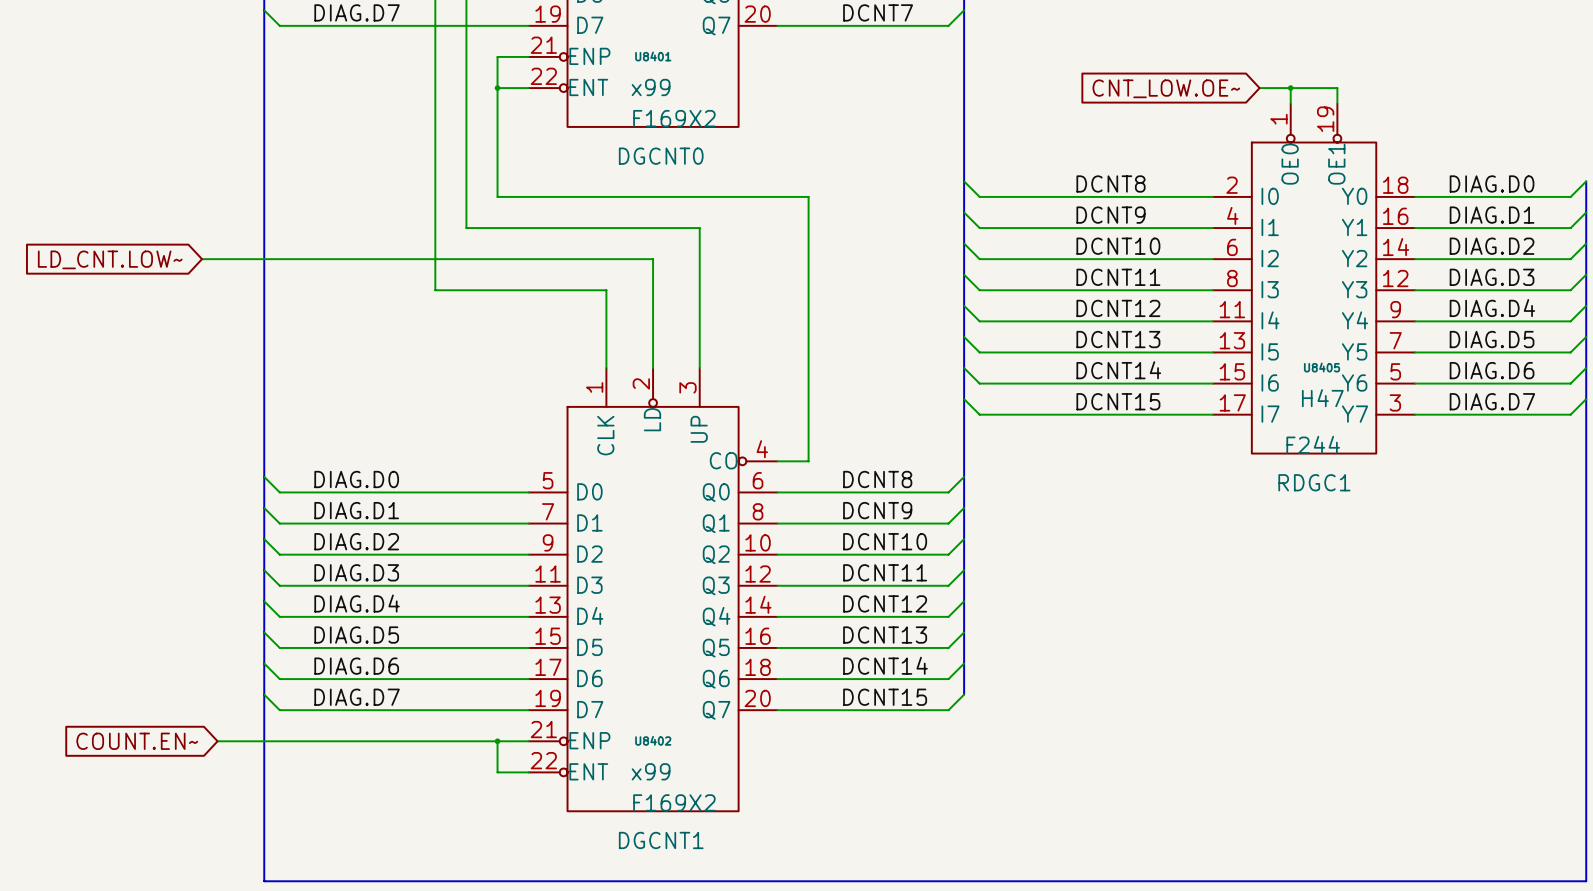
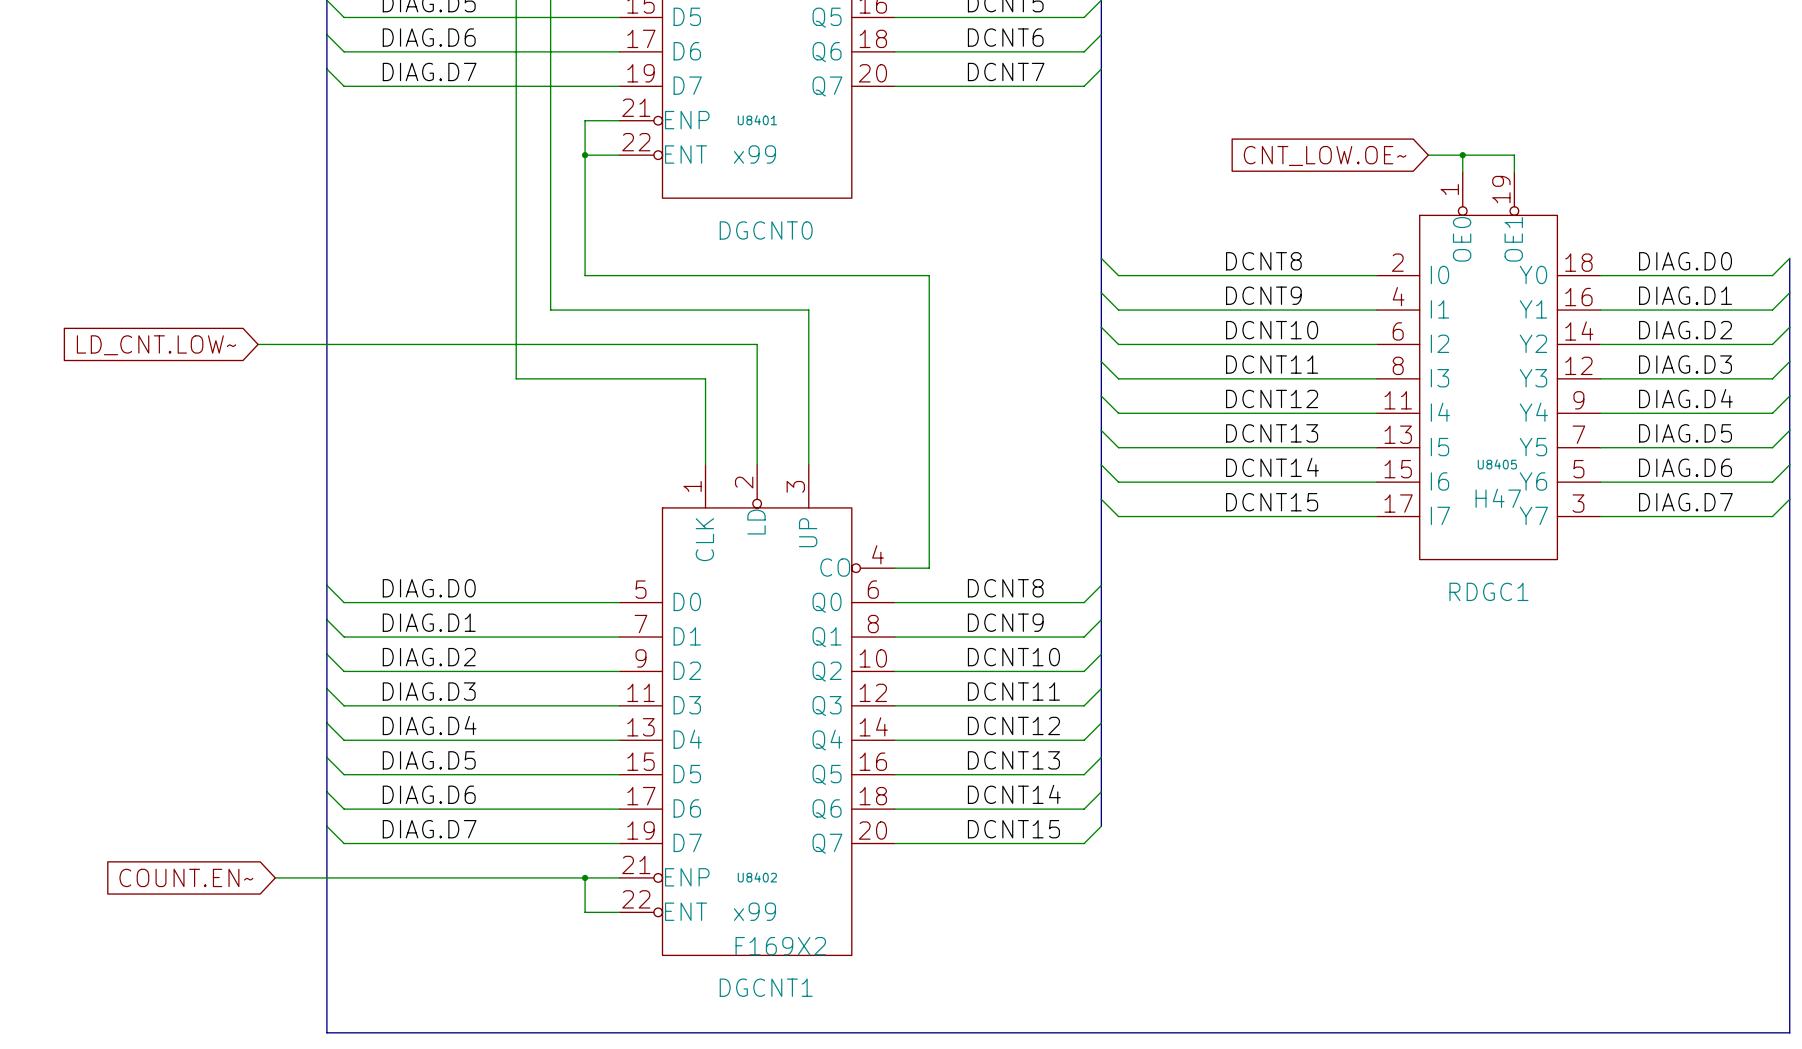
U8401 value: F169X2 (674, 118) -> none
U8405 value: F244 (1313, 444) -> none

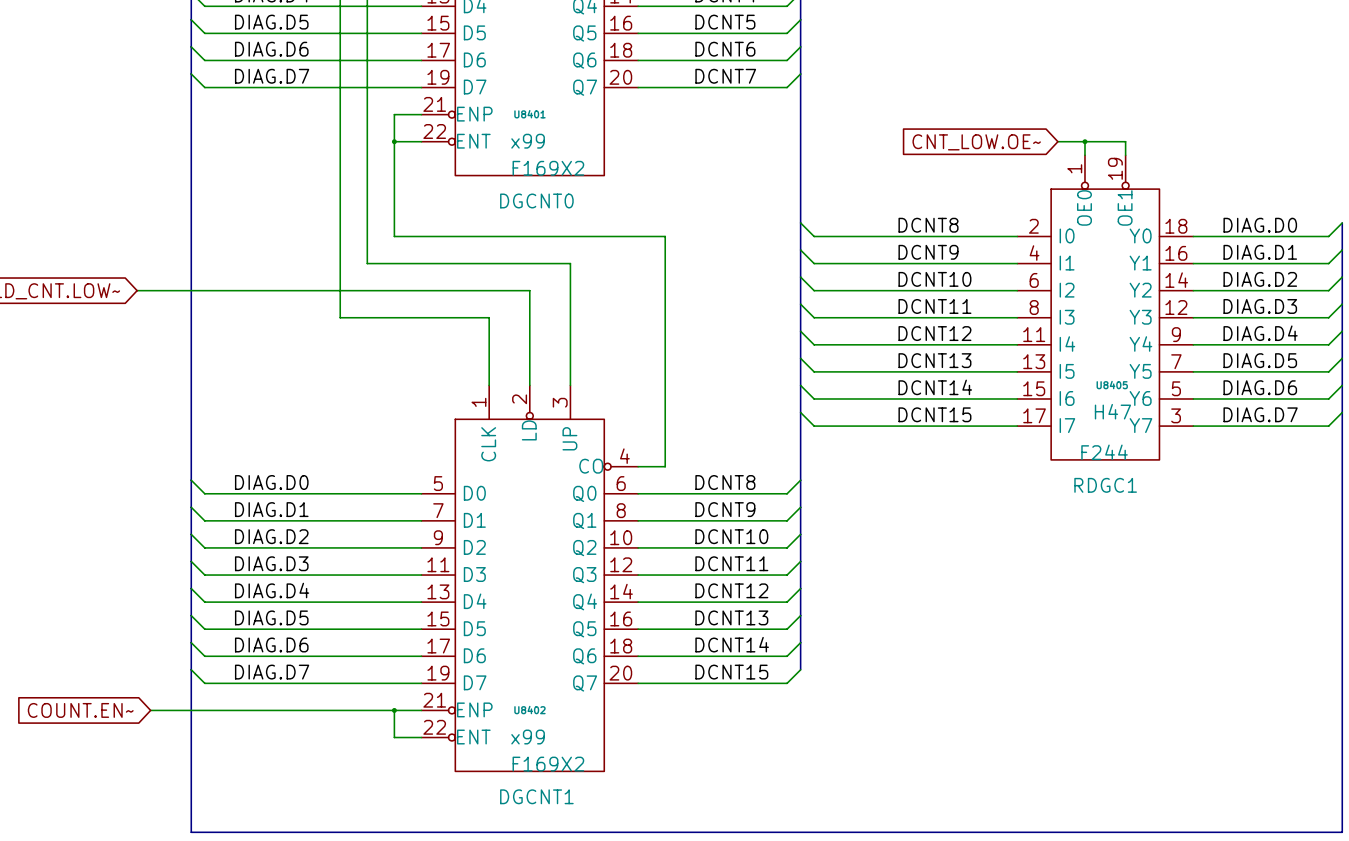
U8401 value: none -> F169X2 (548, 168)
U8405 value: none -> F244 (1104, 452)

